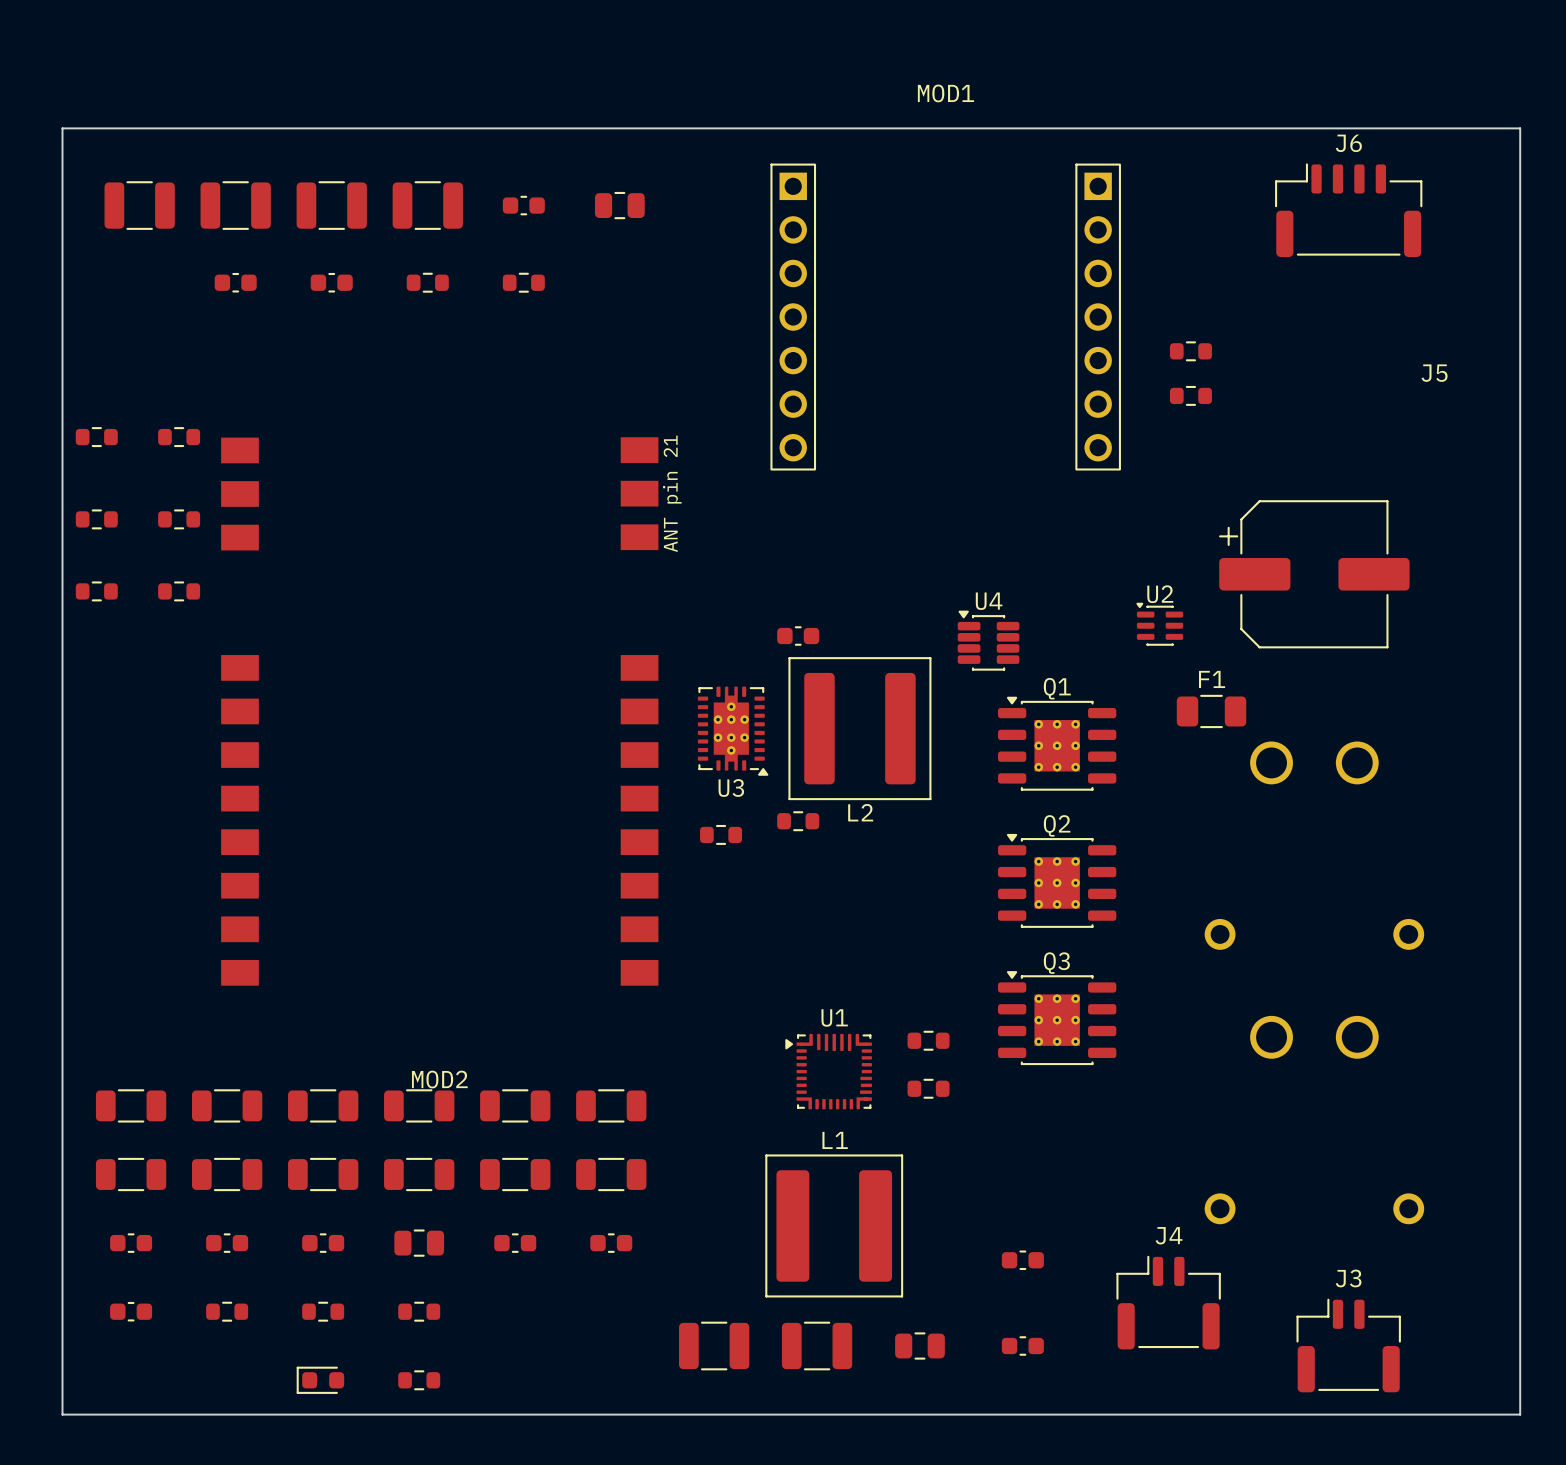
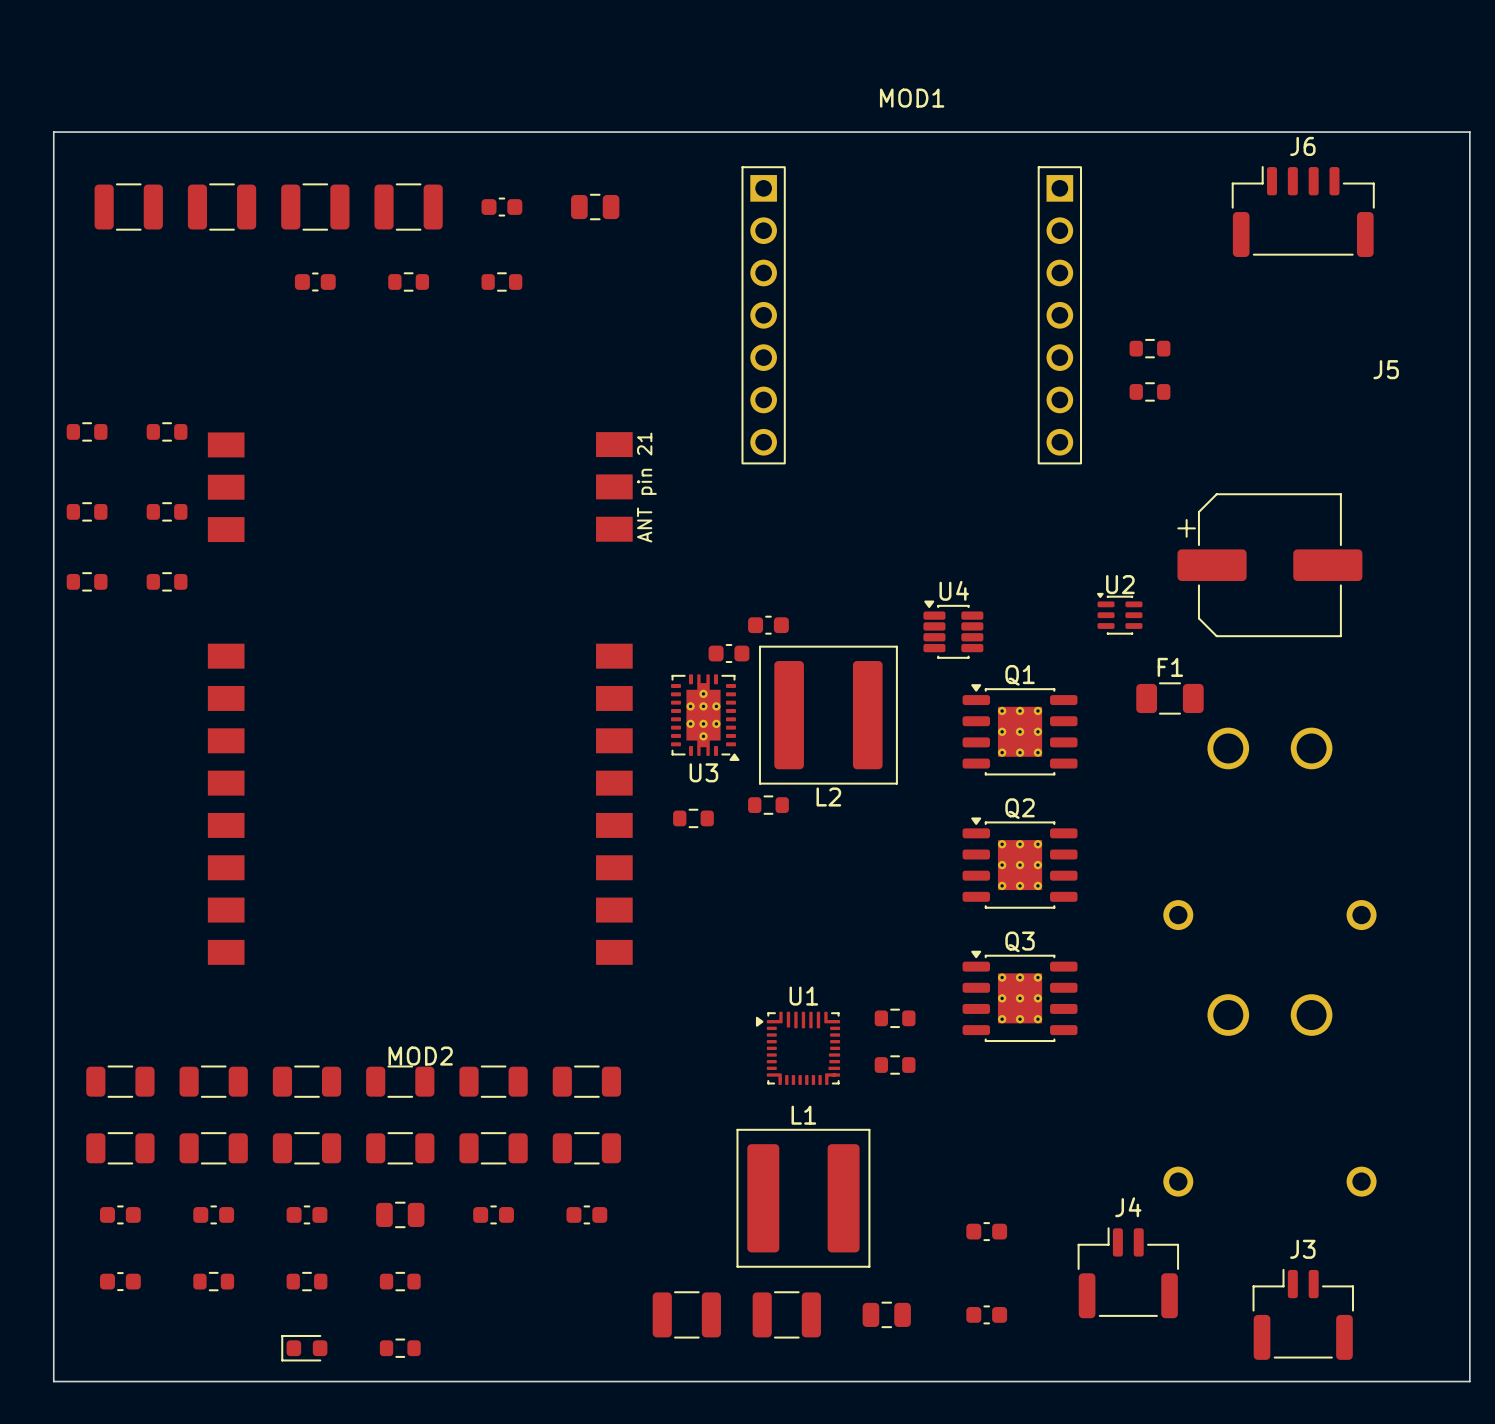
part: (235, 282) -> none
part: none -> (728, 653)

